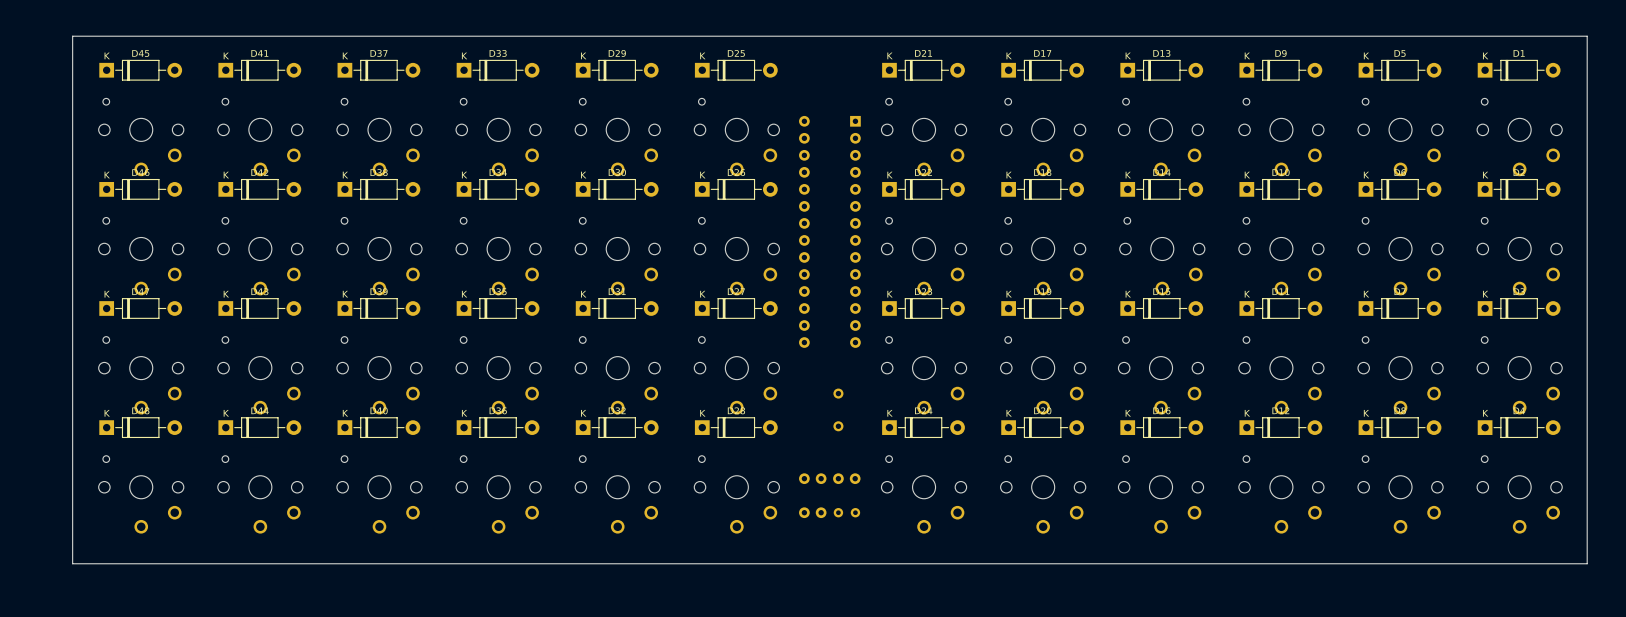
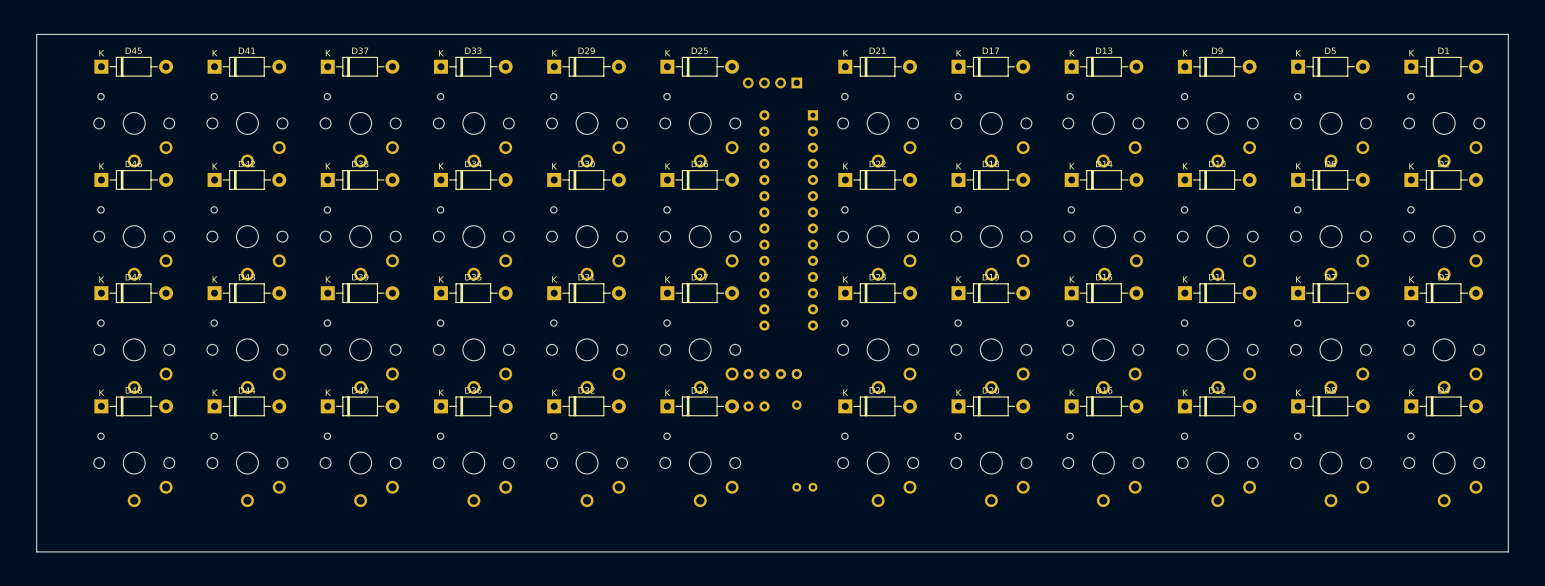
board edge: (72, 36) (72, 563) (1587, 563) -> (69, 34) (36, 34) (36, 551) (1508, 551) (1508, 535)
part: none -> (772, 82)
part: none -> (756, 374)
part: none -> (788, 374)
part: none -> (756, 406)
part: (812, 478) -> none
part: (846, 478) -> none
part: (812, 512) -> none

